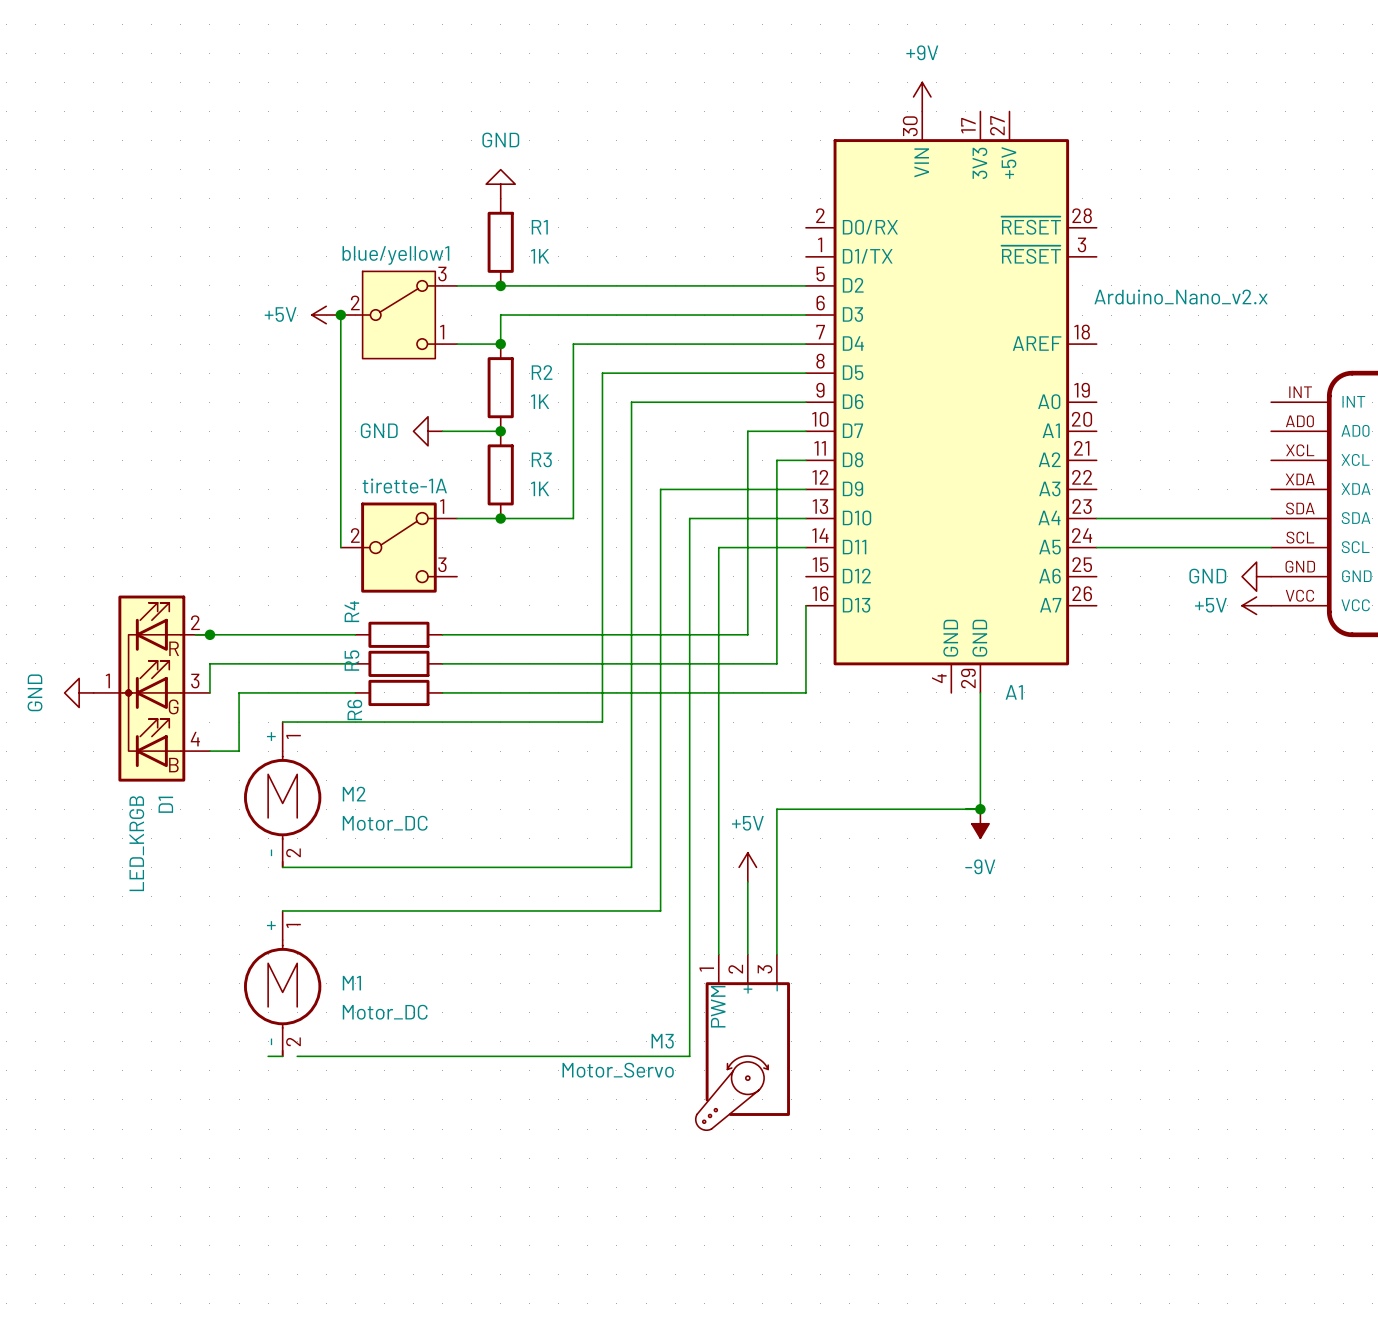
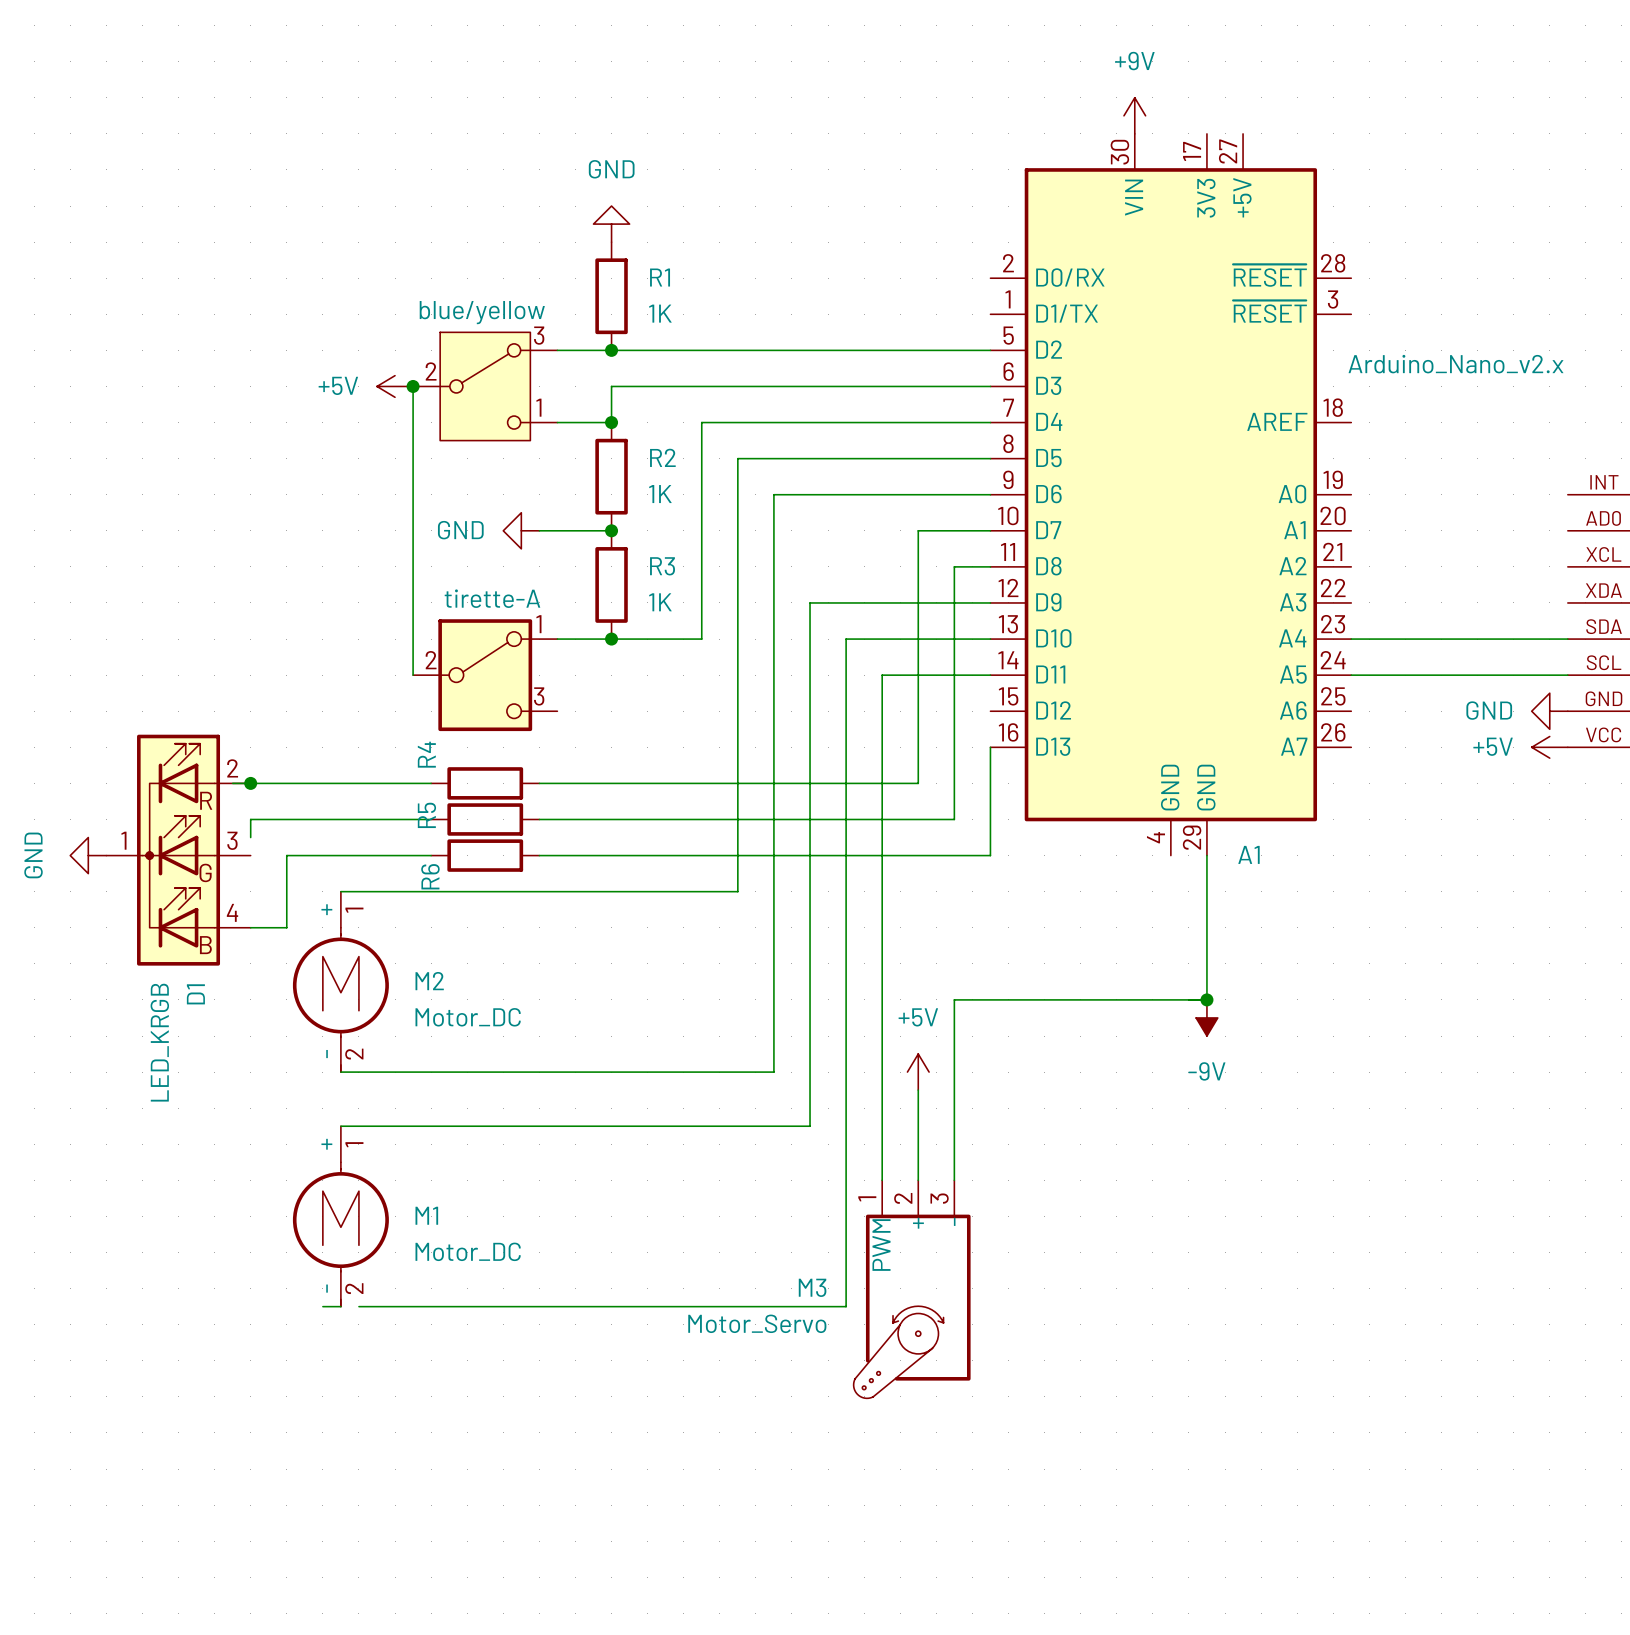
blue/yellow1 name: blue/yellow1 (395, 255) -> blue/yellow (482, 312)
tirette-1A name: tirette-1A (404, 485) -> tirette-A (492, 598)
wire: (209, 678) (209, 692) -> none

